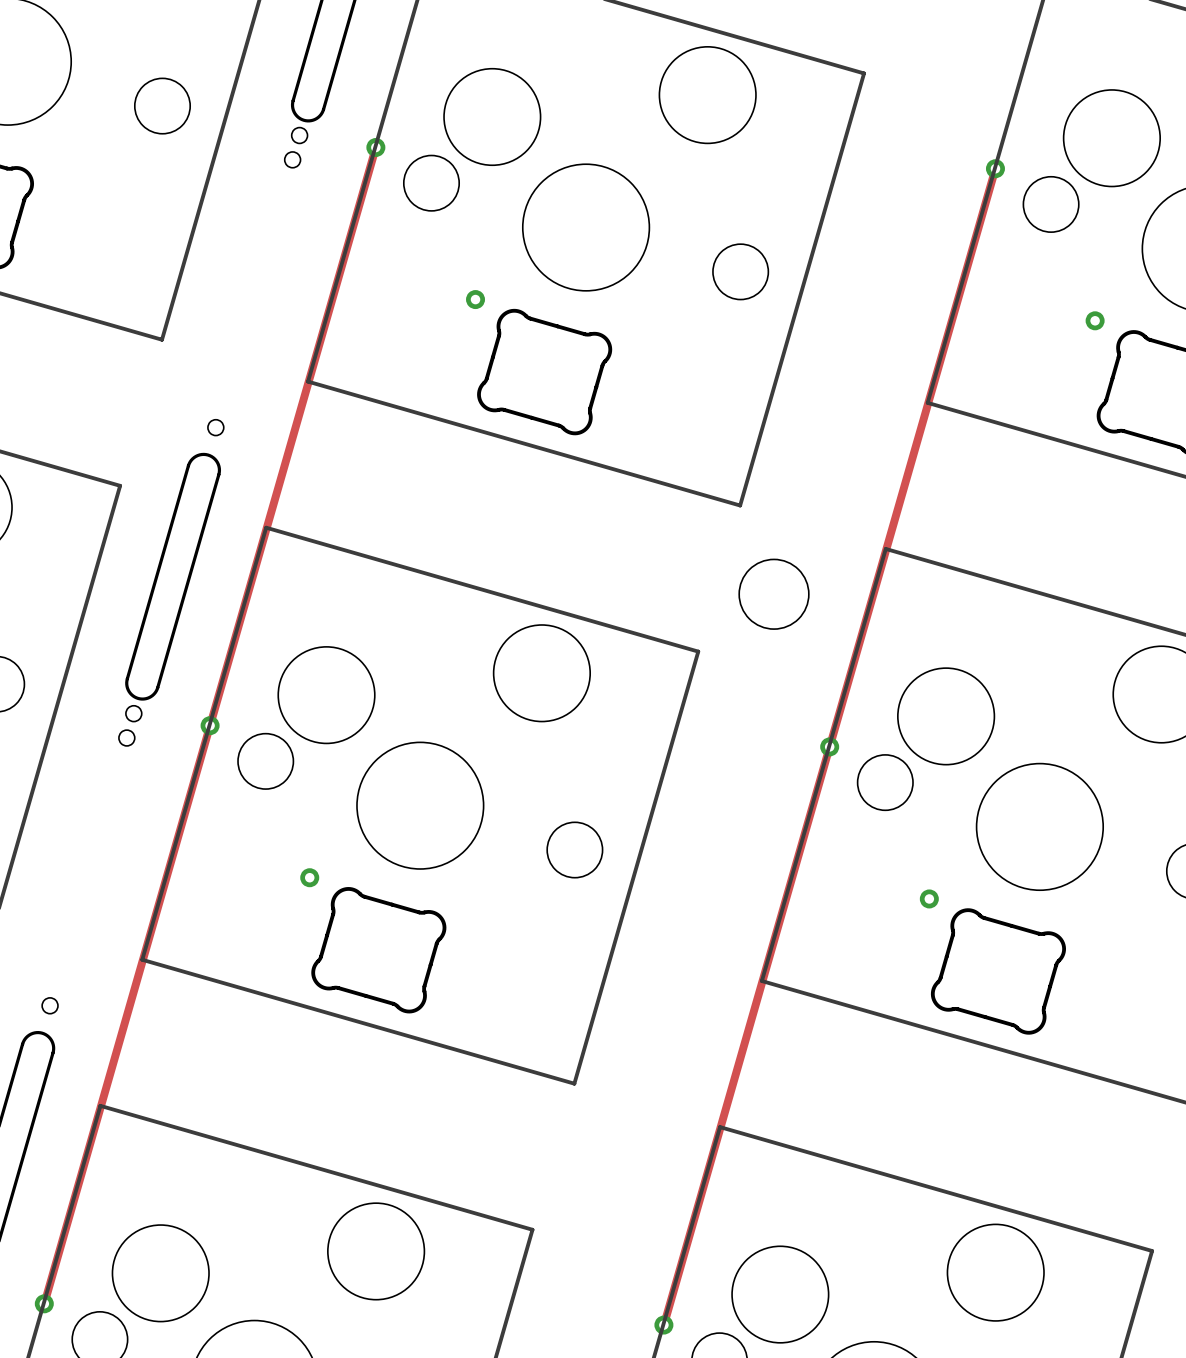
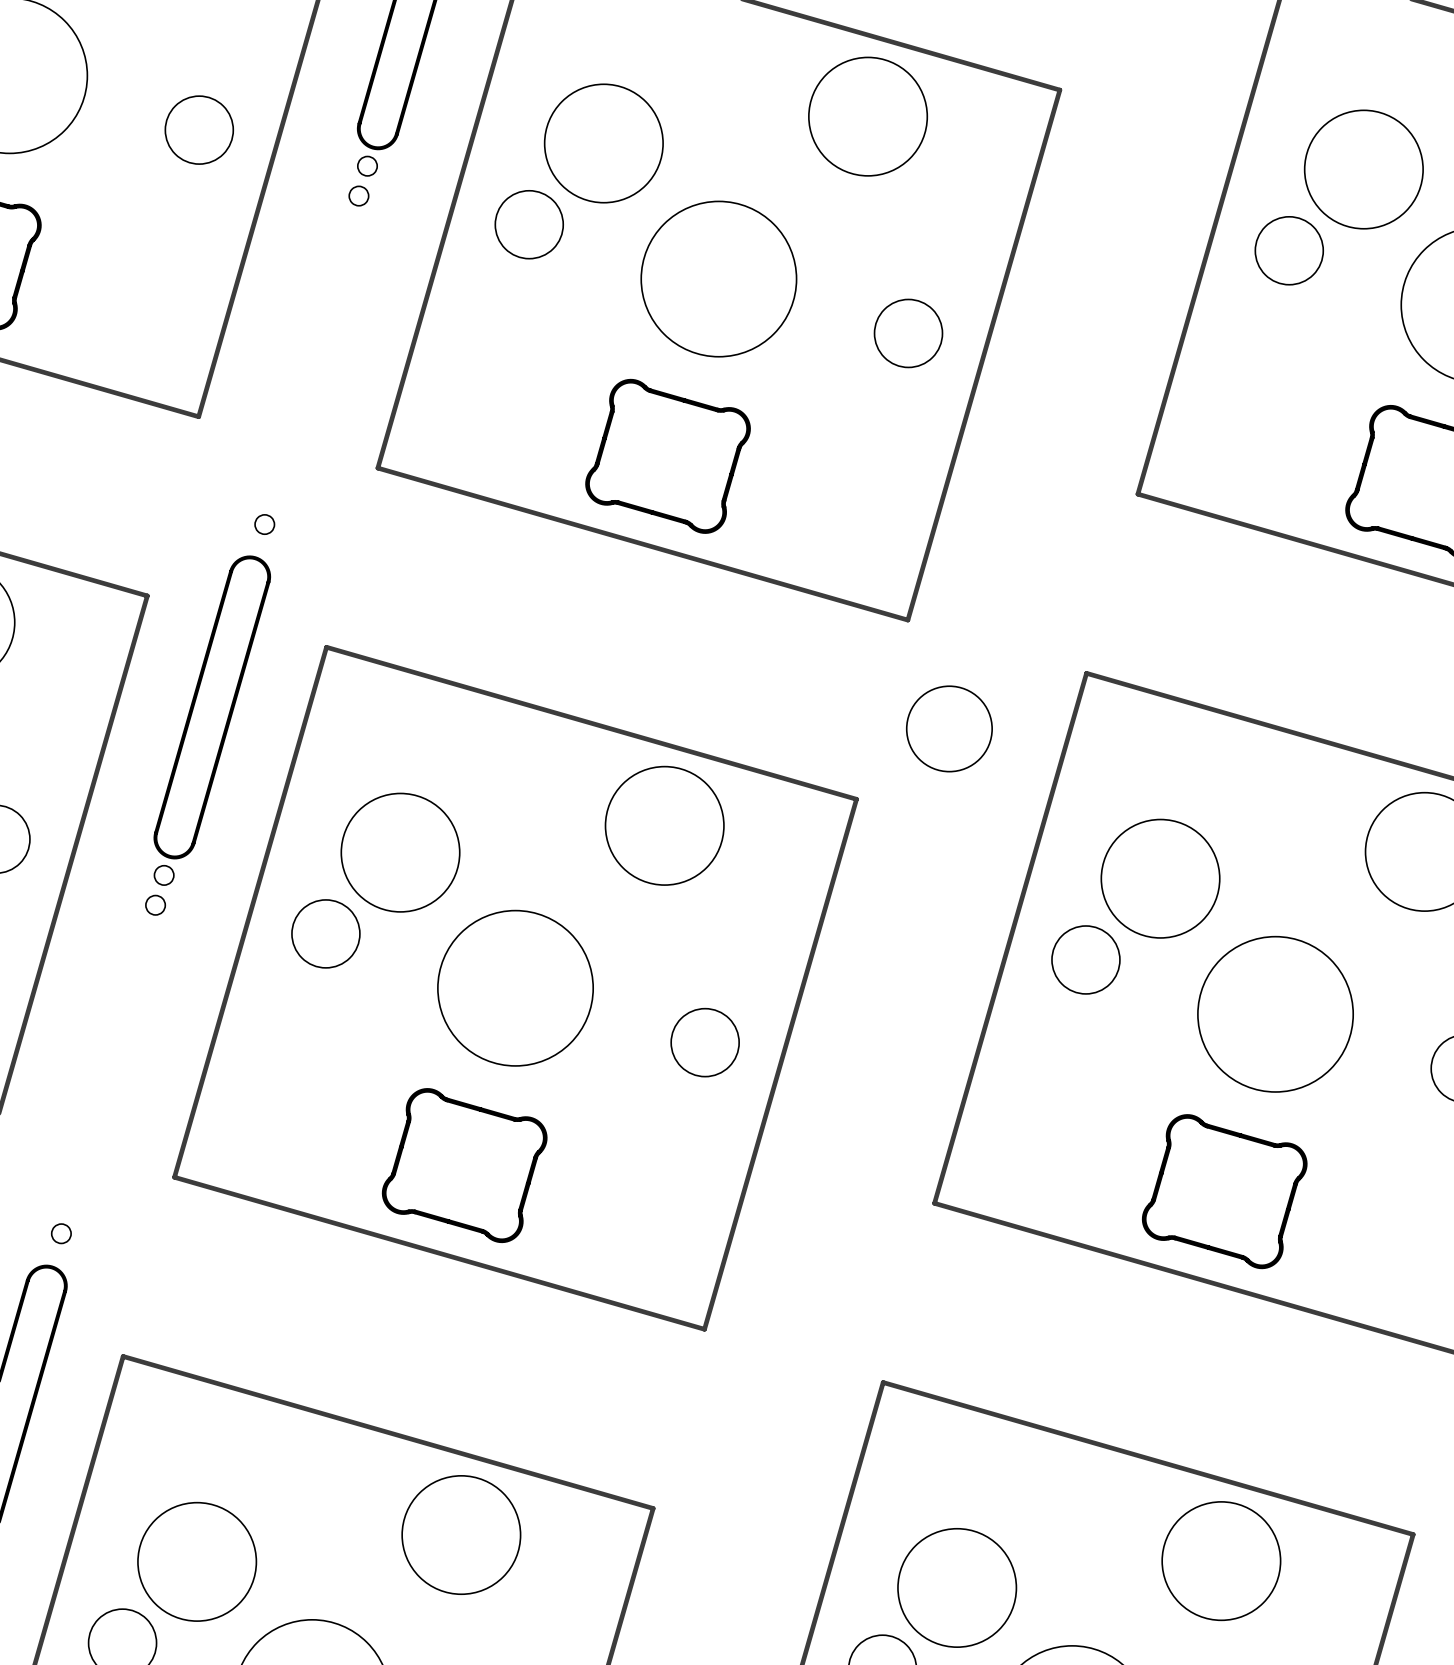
track: (375, 147) (44, 1303) -> none
via: (375, 147) -> none
track: (995, 168) (663, 1325) -> none
via: (995, 168) -> none
via: (475, 299) -> none
via: (1095, 320) -> none
via: (210, 725) -> none
via: (829, 746) -> none
via: (309, 877) -> none
via: (929, 898) -> none
via: (44, 1303) -> none
via: (663, 1325) -> none

